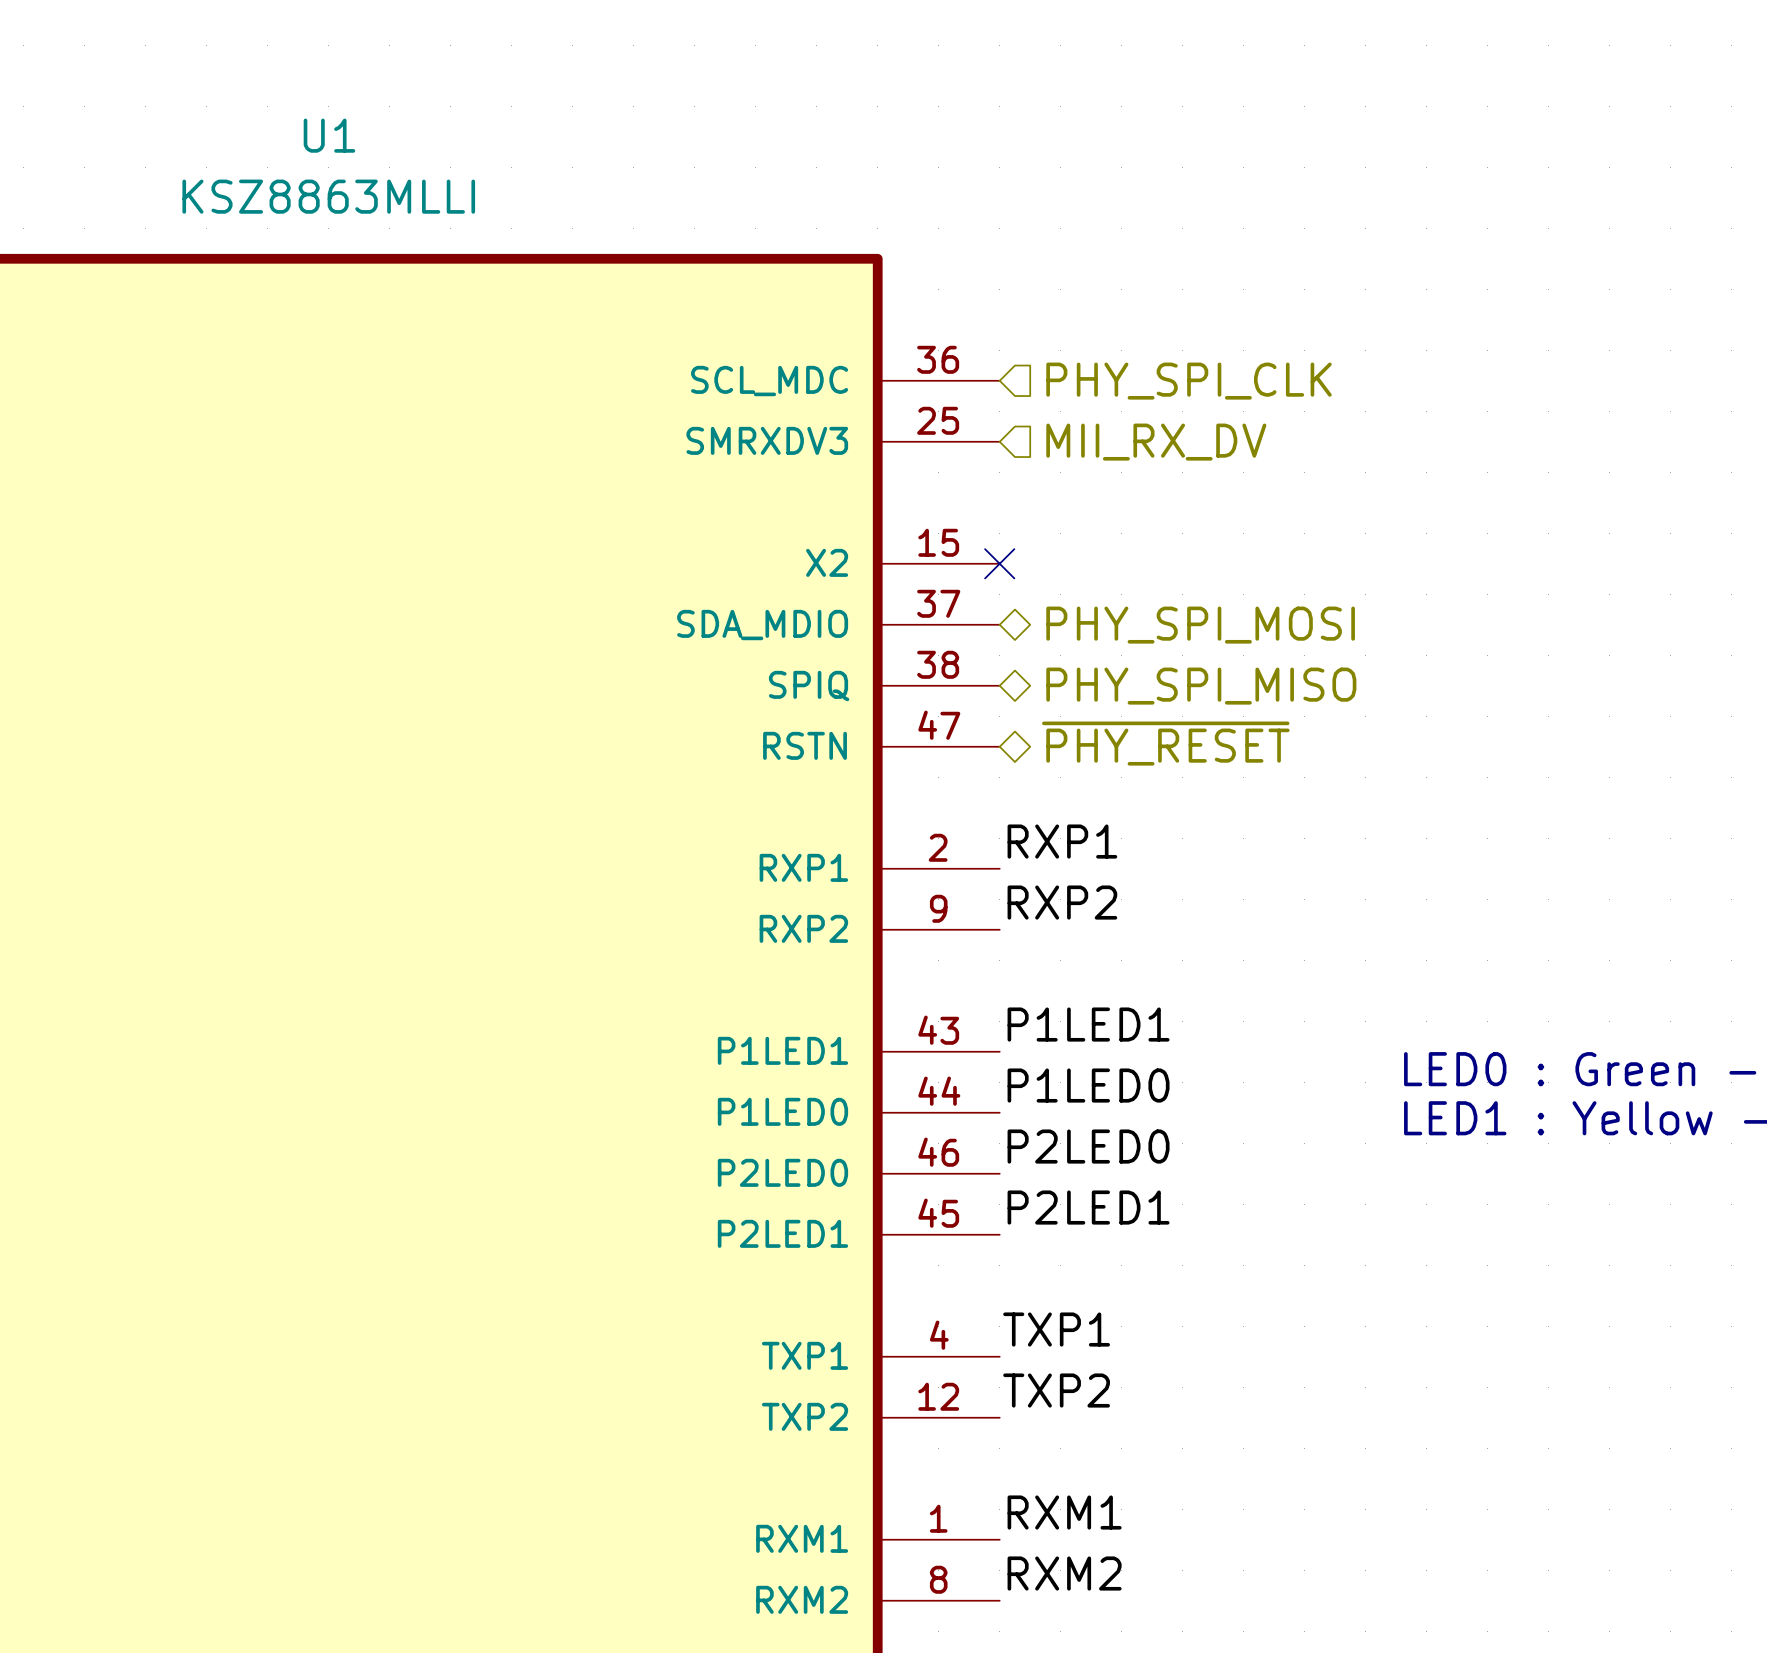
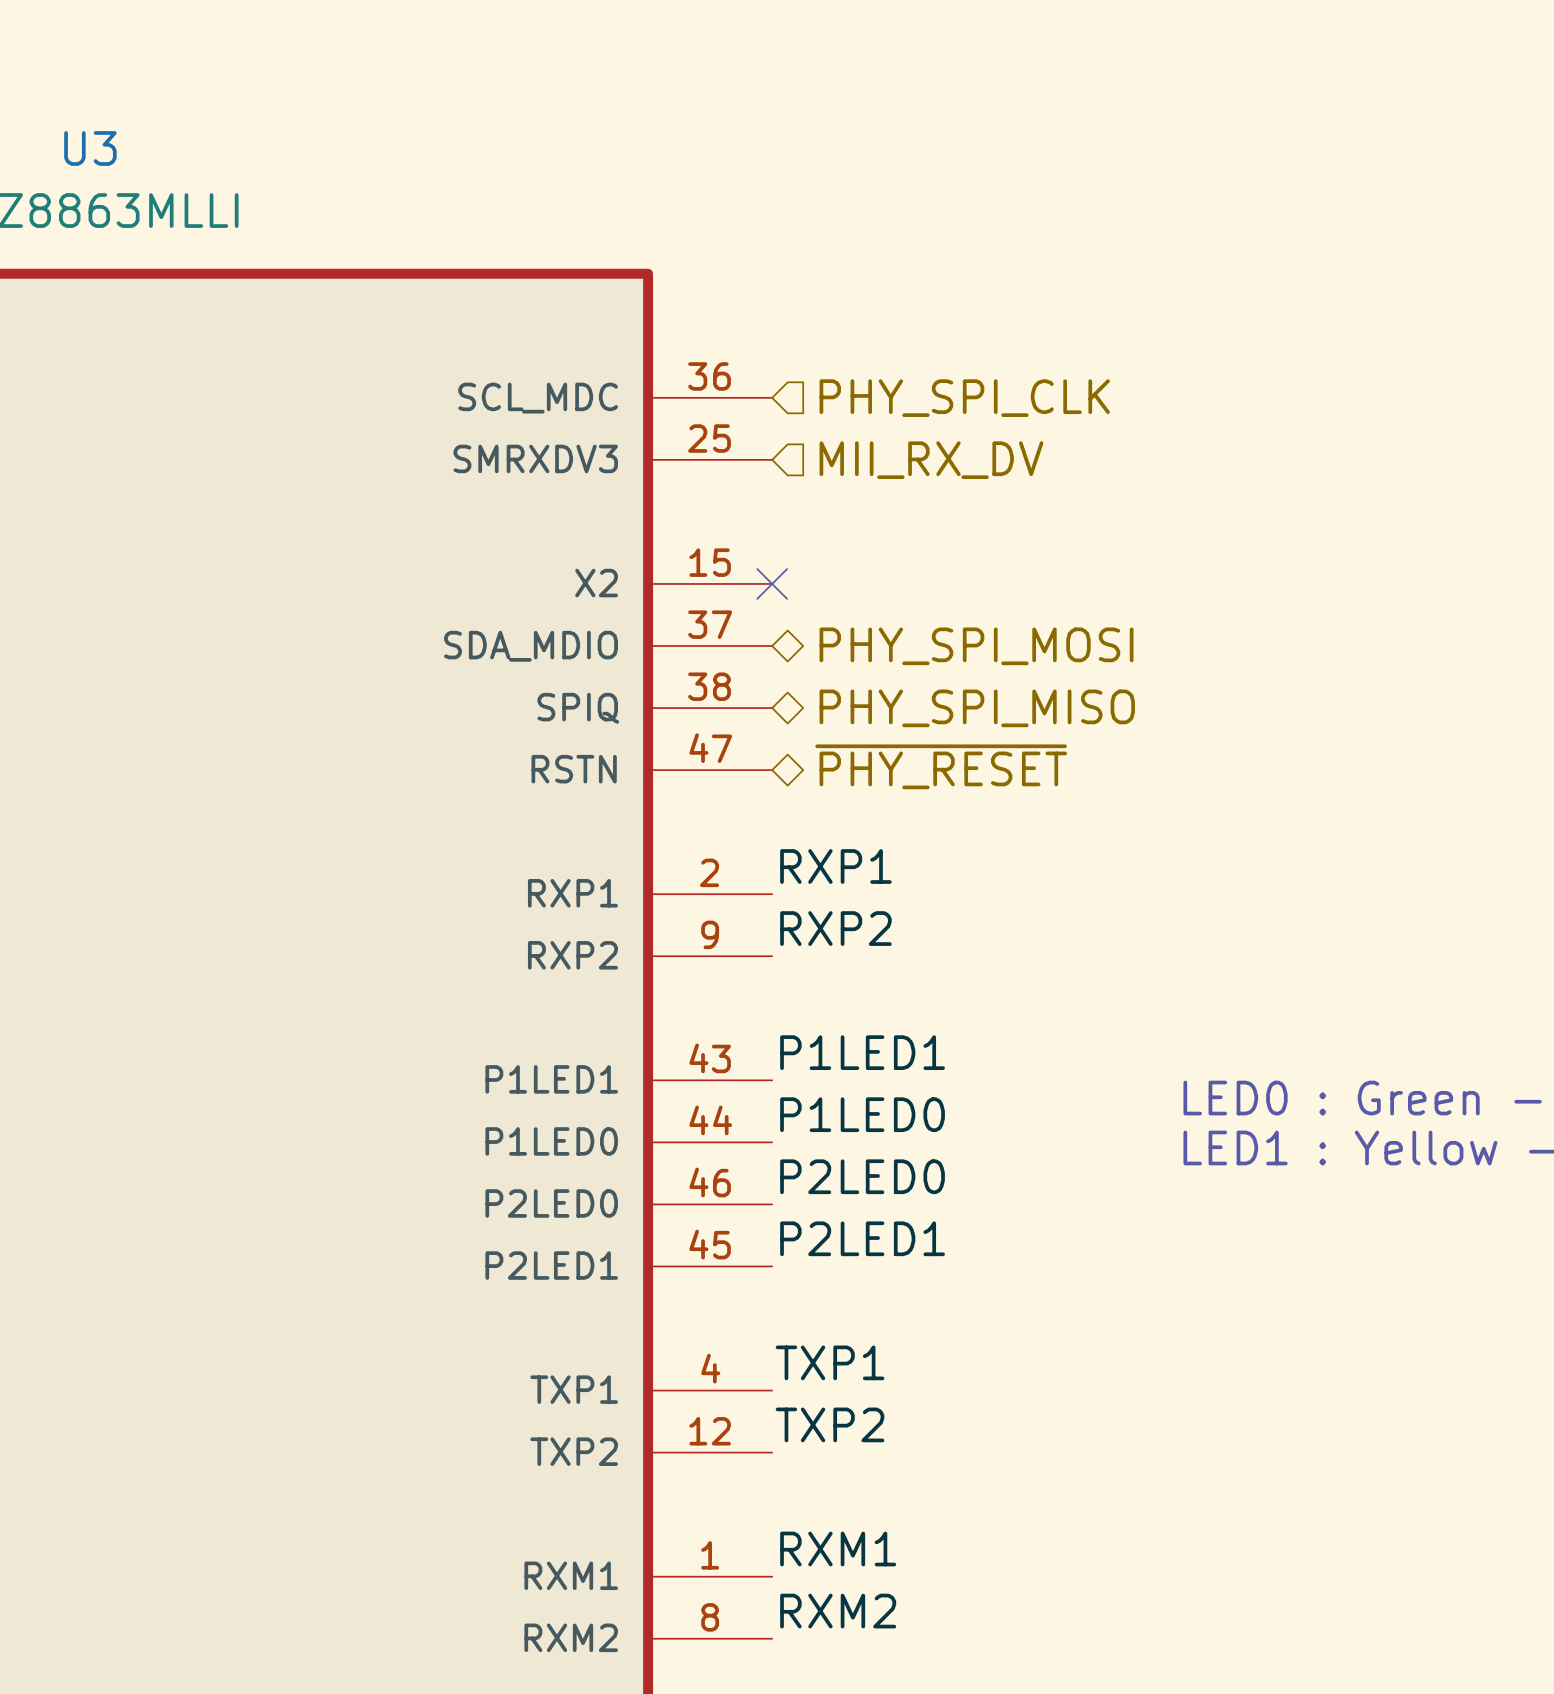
U1 name: U1 (329, 135) -> U3 (90, 148)

